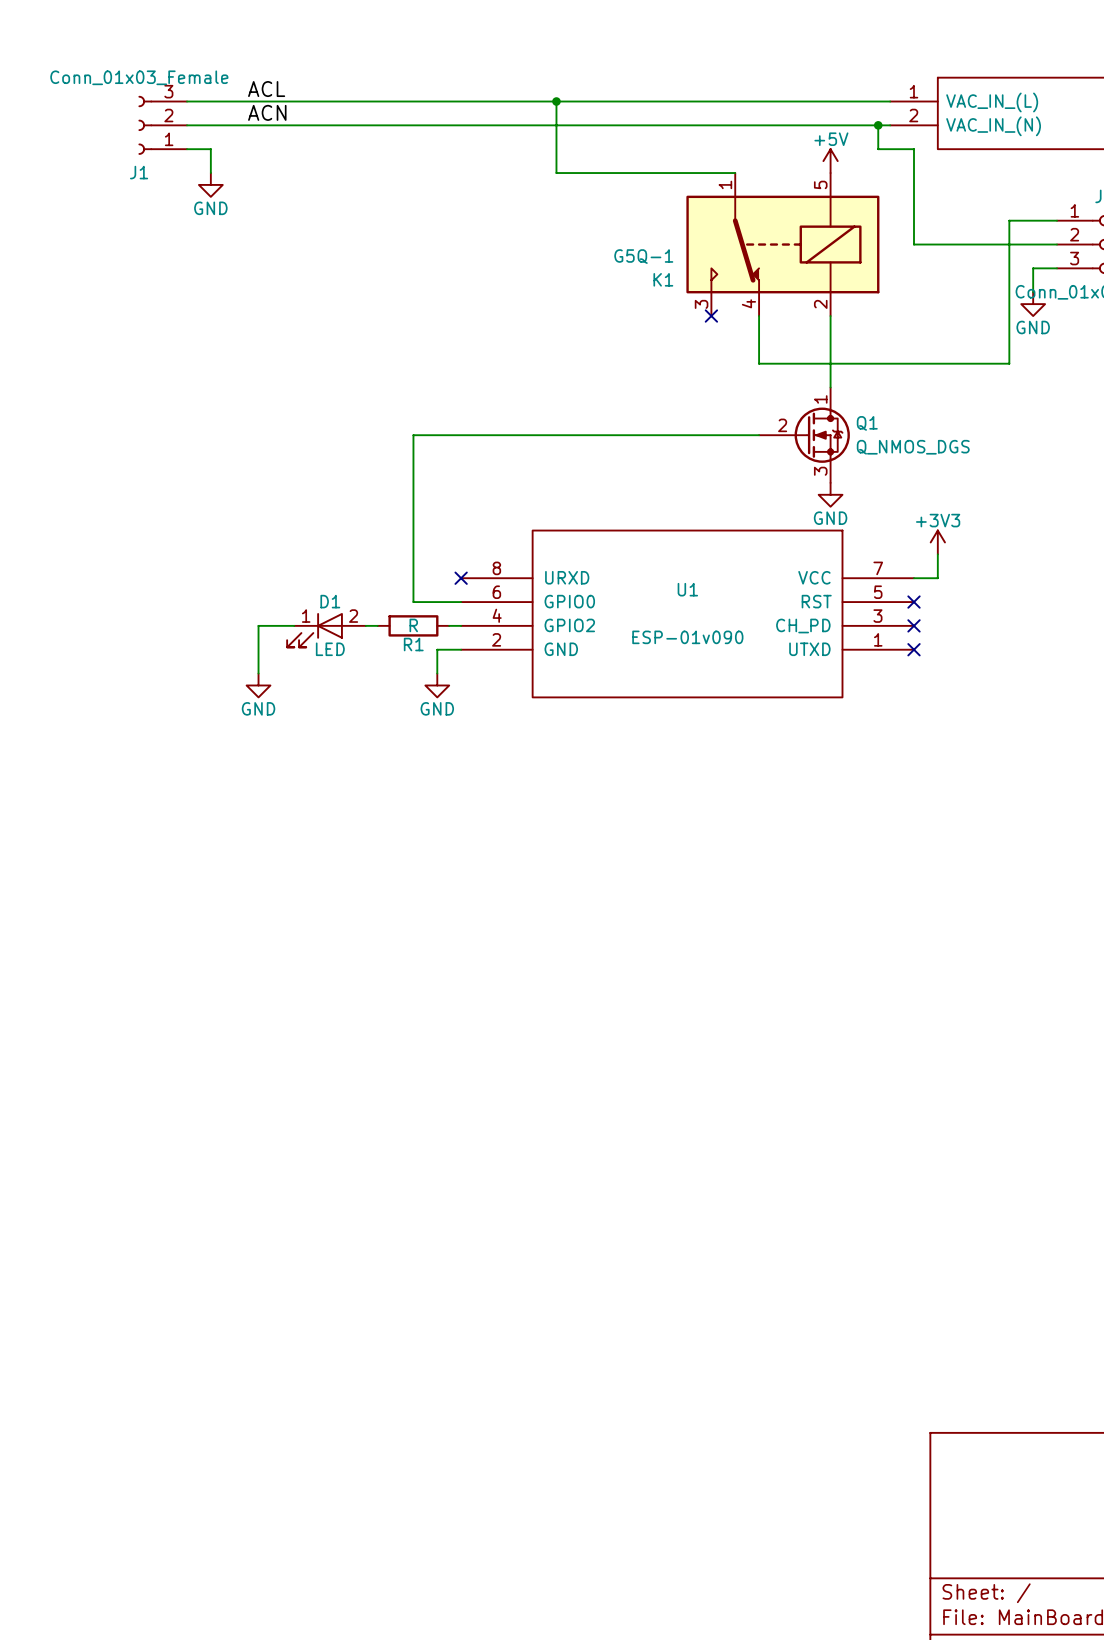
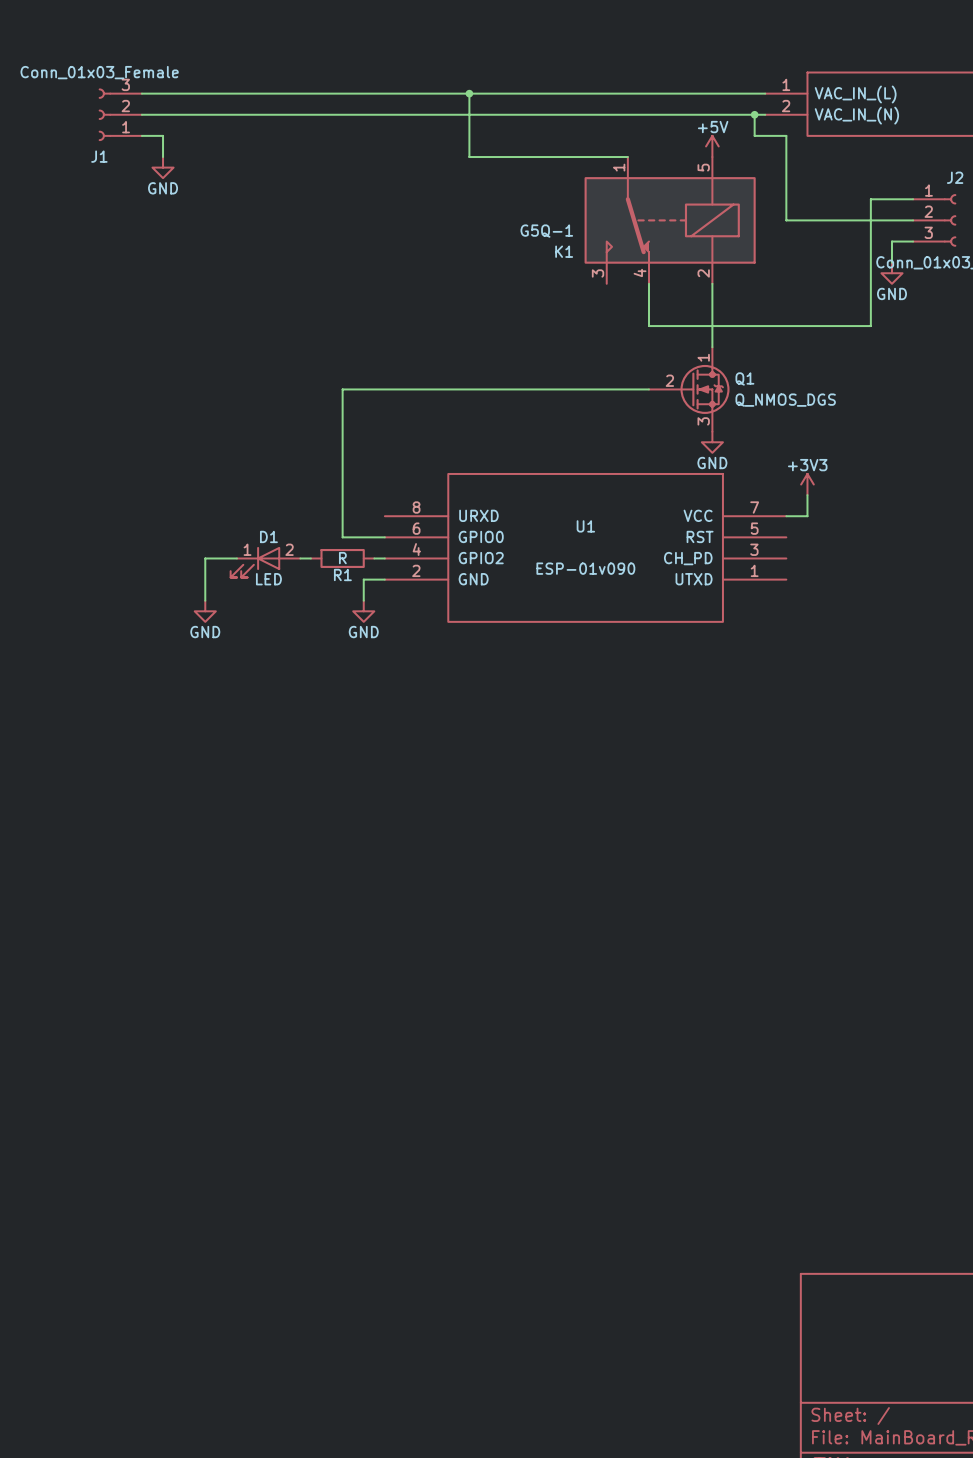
label: ACL (266, 89) -> none
label: ACN (267, 112) -> none
no-connect mark: (711, 316) -> none
no-connect mark: (461, 578) -> none
no-connect mark: (914, 602) -> none
no-connect mark: (914, 625) -> none
no-connect mark: (914, 649) -> none

